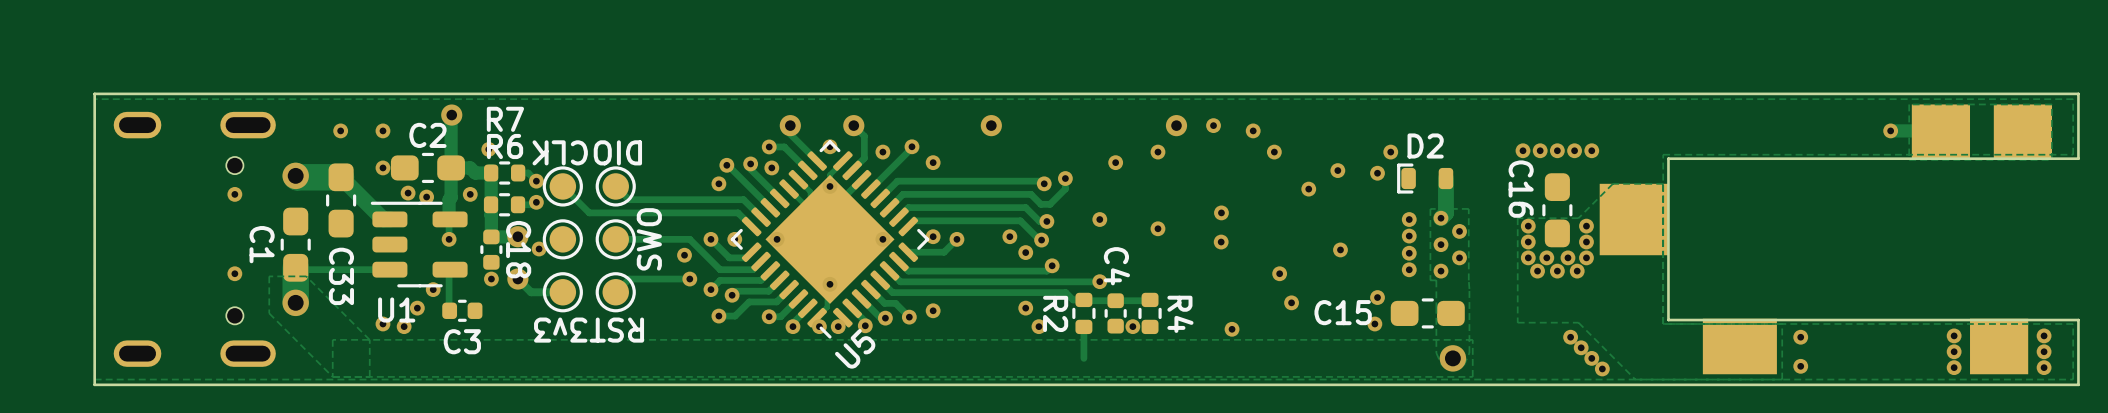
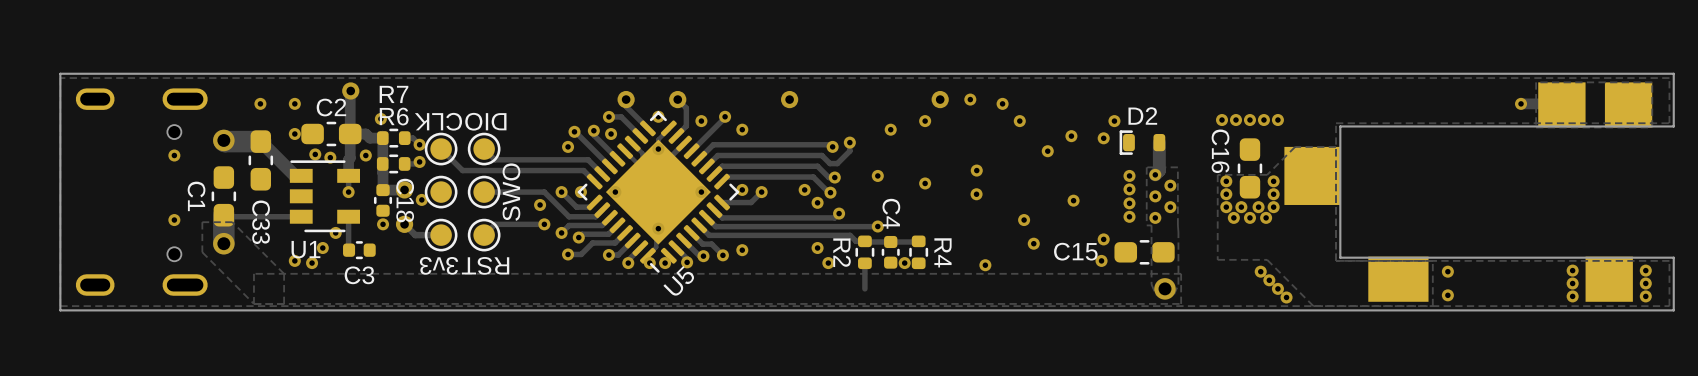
U1 footprint: [370, 201, 468, 288] -> [289, 160, 361, 233]

